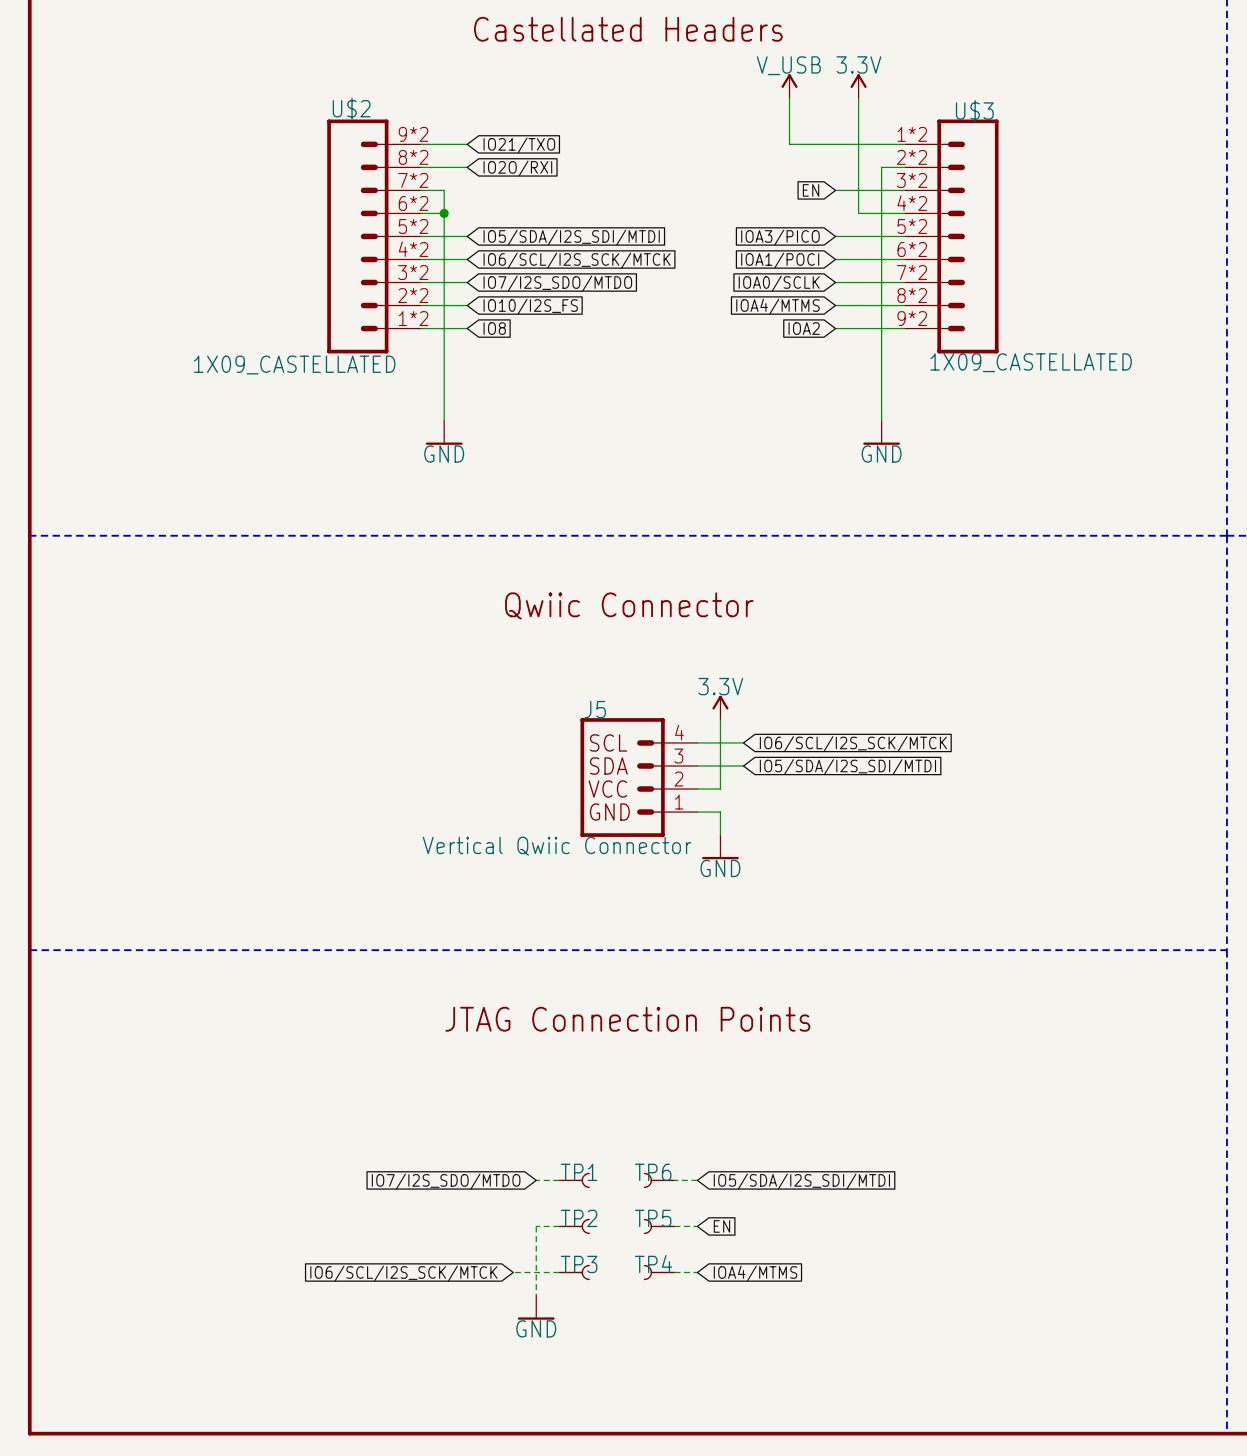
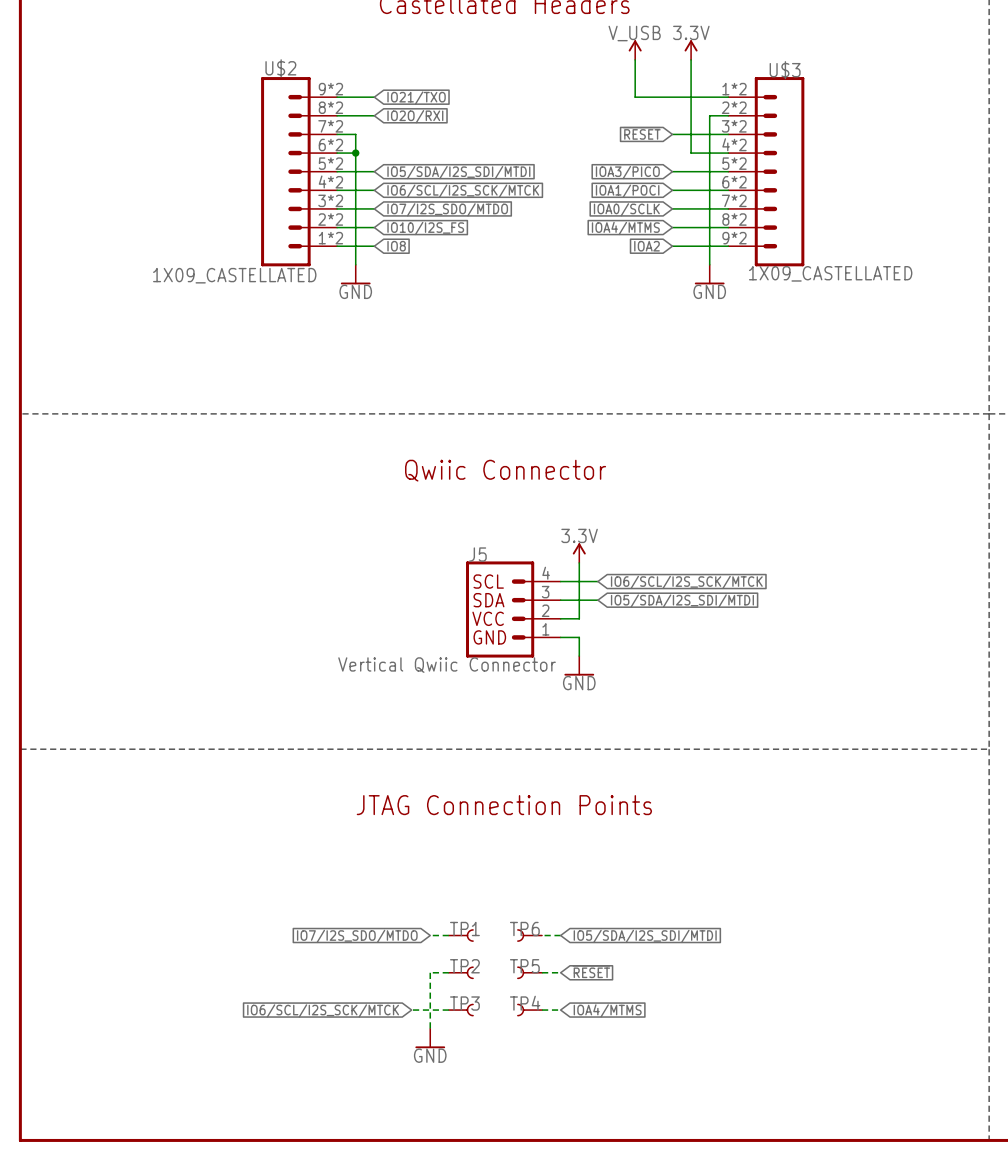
global label: EN (811, 190) -> ~{RESET} (641, 133)
wire: (444, 351) (444, 420) -> none
wire: (881, 351) (881, 420) -> none
power symbol position: GND (444, 432) -> GND (355, 274)
power symbol position: GND (881, 432) -> GND (709, 274)
global label: EN (721, 1226) -> ~{RESET} (591, 971)

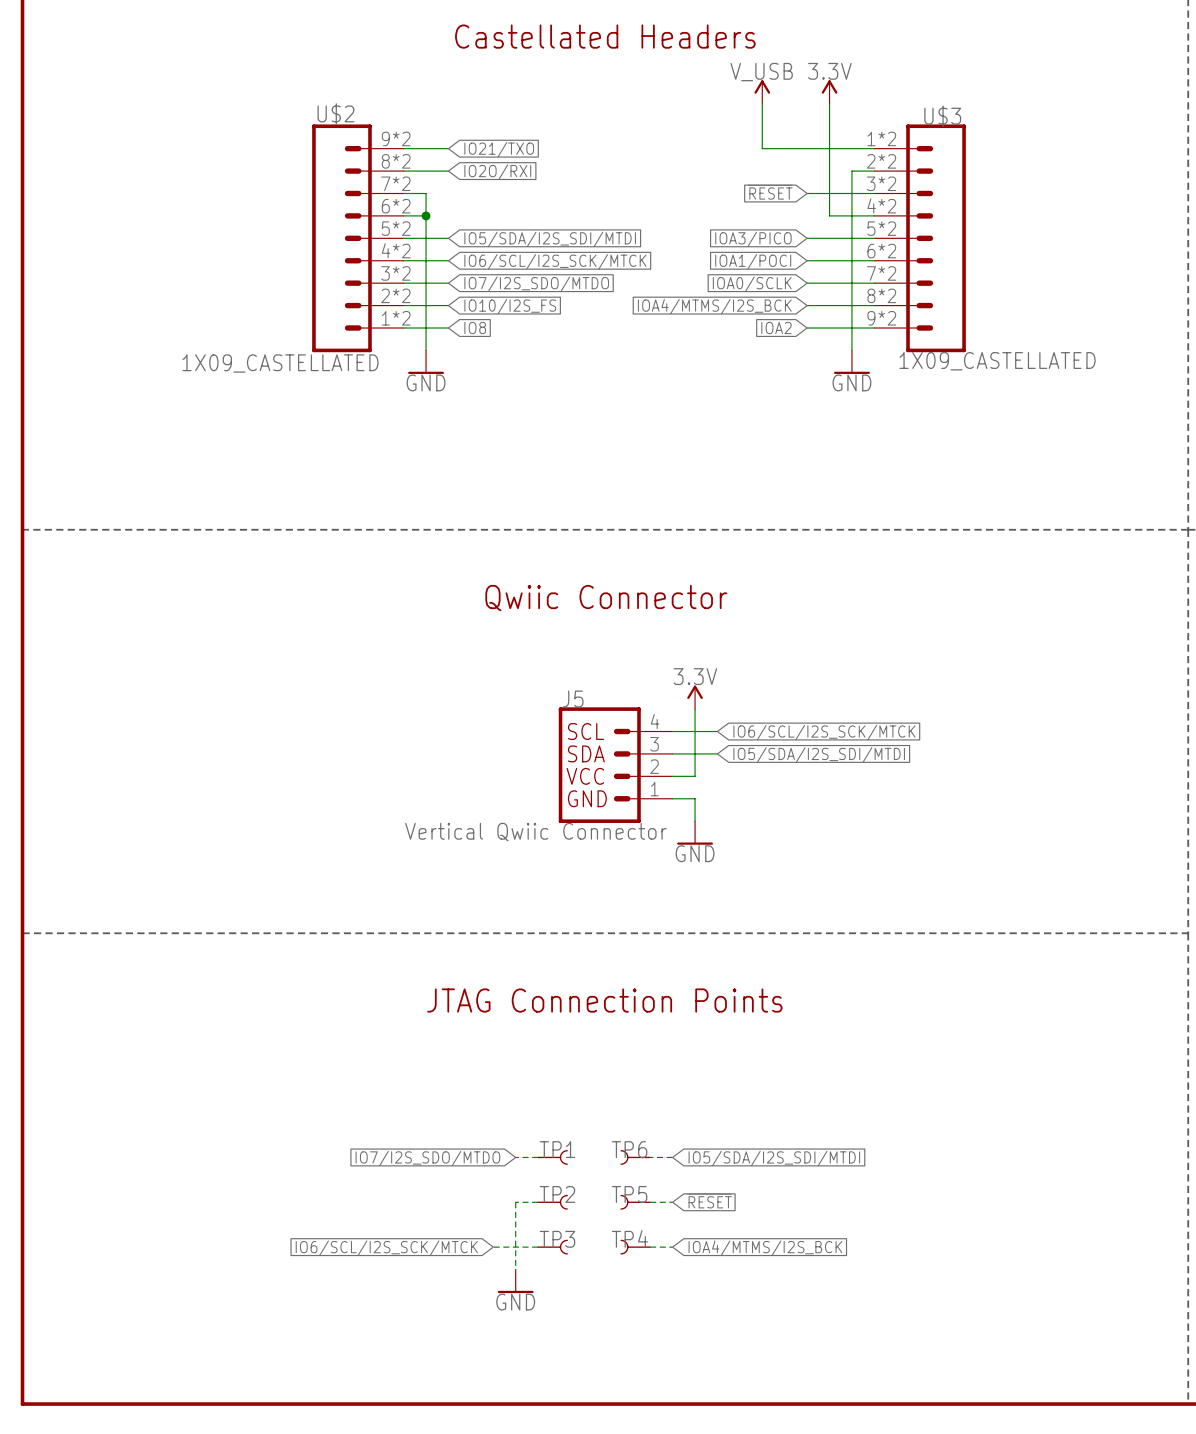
global label: IOA4/MTMS (625, 228) -> IOA4/MTMS/I2S_BCK (714, 306)
global label: IOA4/MTMS (607, 1010) -> IOA4/MTMS/I2S_BCK (765, 1248)

